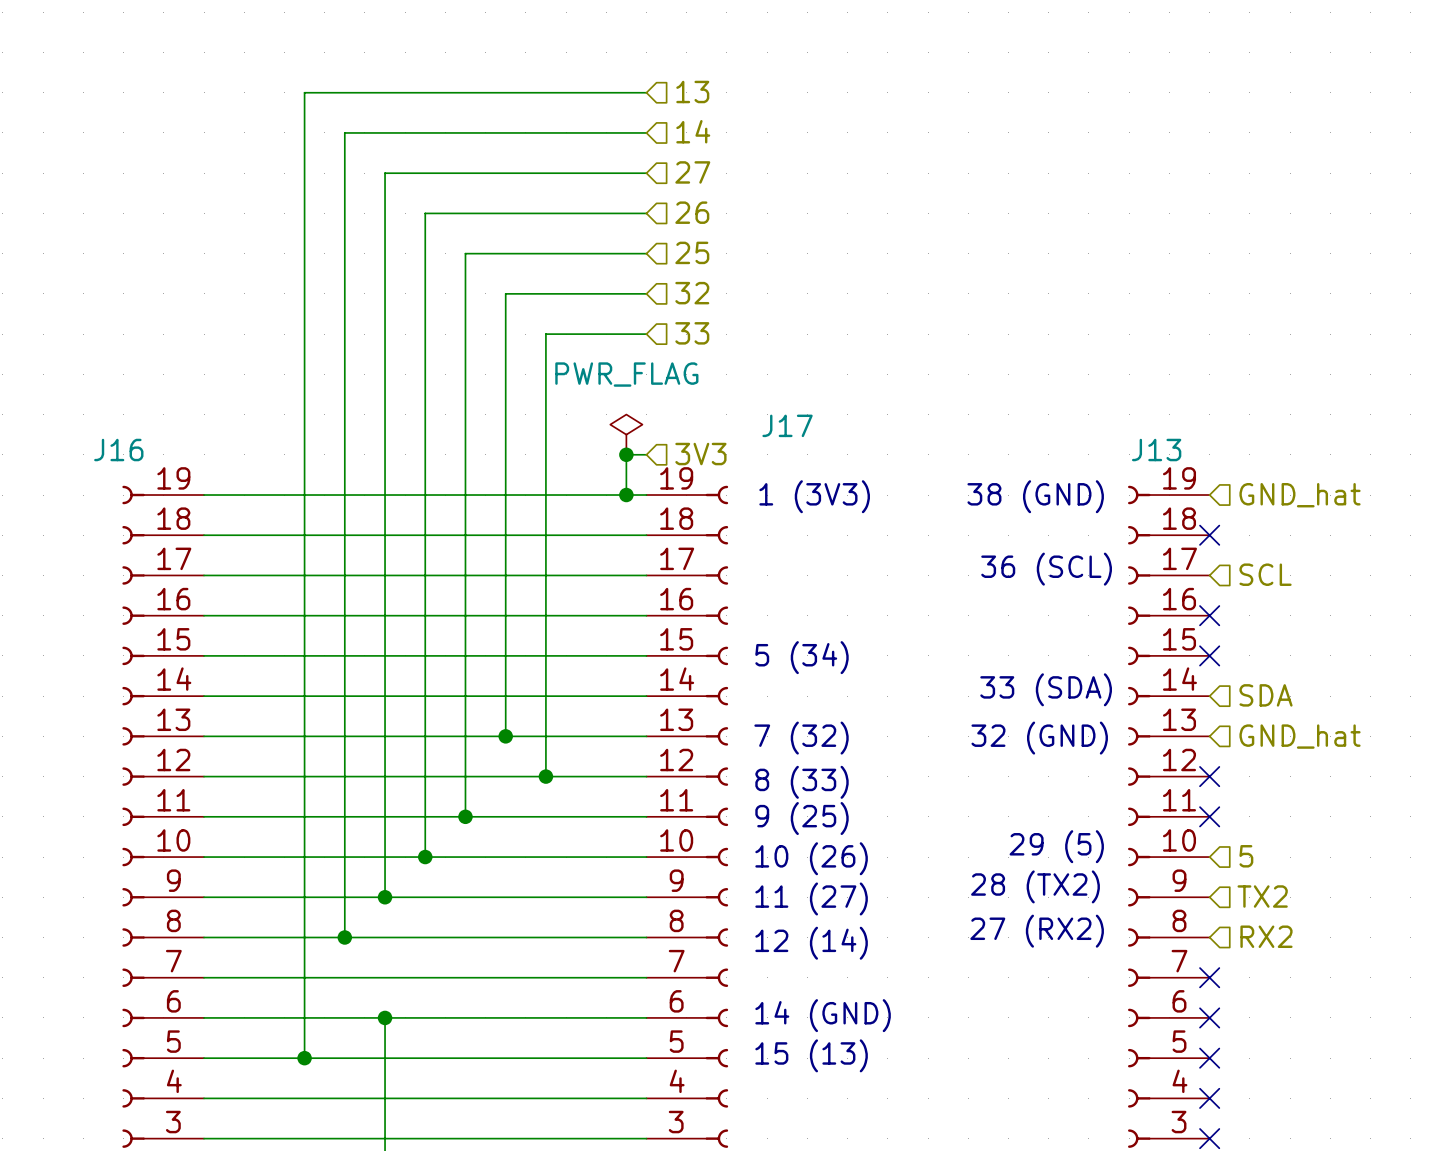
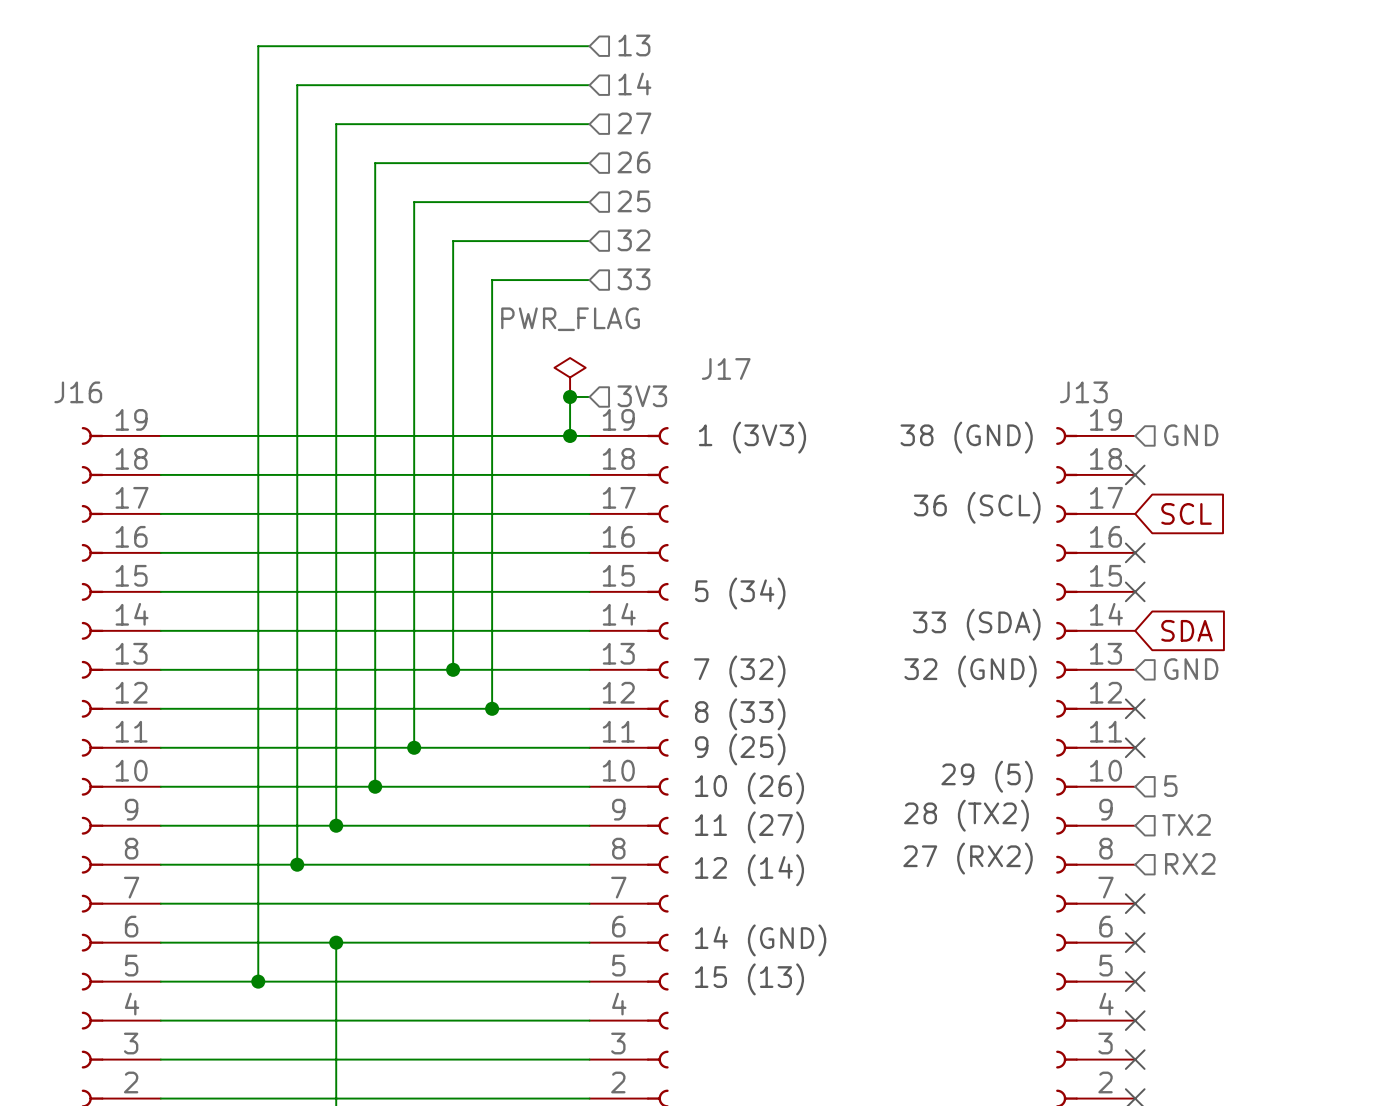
hierarchical label: GND_hat (1300, 495) -> GND (1191, 435)
hierarchical label: SCL (1265, 574) -> none
global label: none -> SCL (1186, 513)
hierarchical label: SDA (1266, 695) -> none
global label: none -> SDA (1186, 630)
hierarchical label: GND_hat (1300, 736) -> GND (1191, 669)

